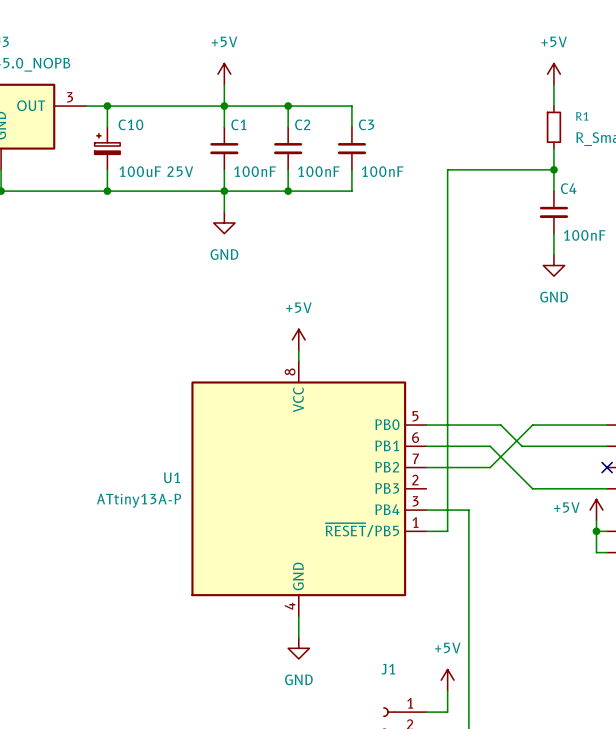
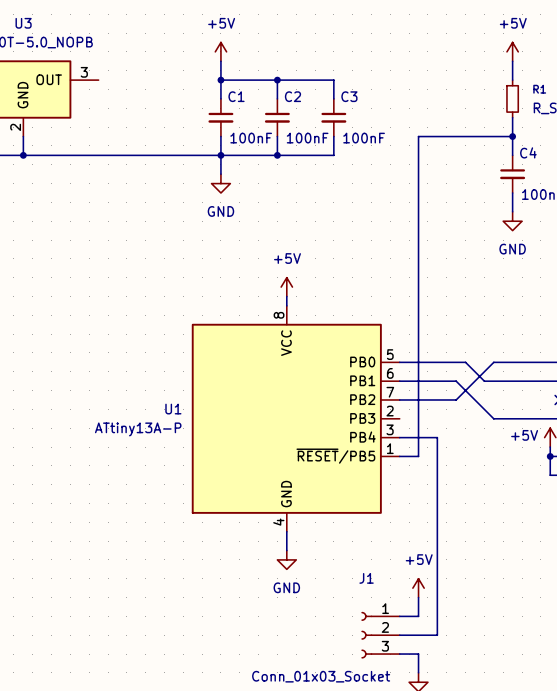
wire: (86, 106) (224, 106) -> none
wire: (107, 106) (107, 127) -> none
junction: (107, 106) -> none
C10: 100uF 25V (107, 148) -> none
wire: (107, 169) (107, 191) -> none
junction: (107, 191) -> none

